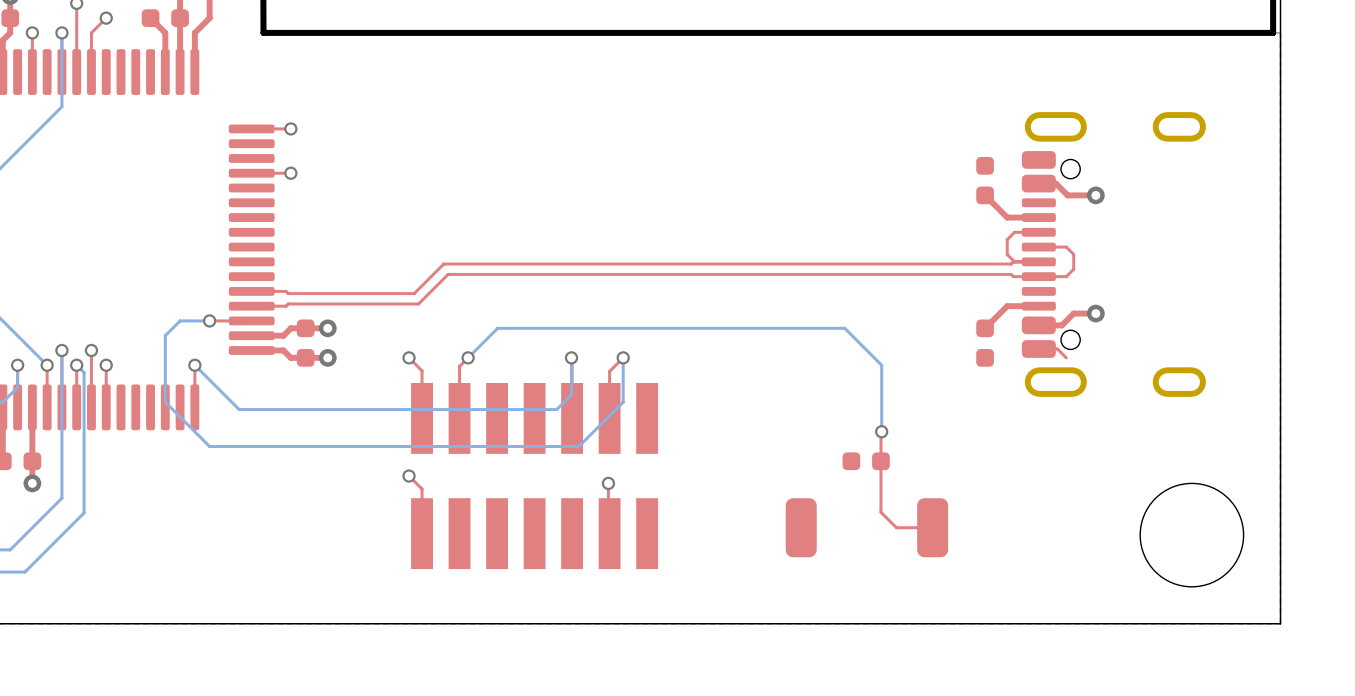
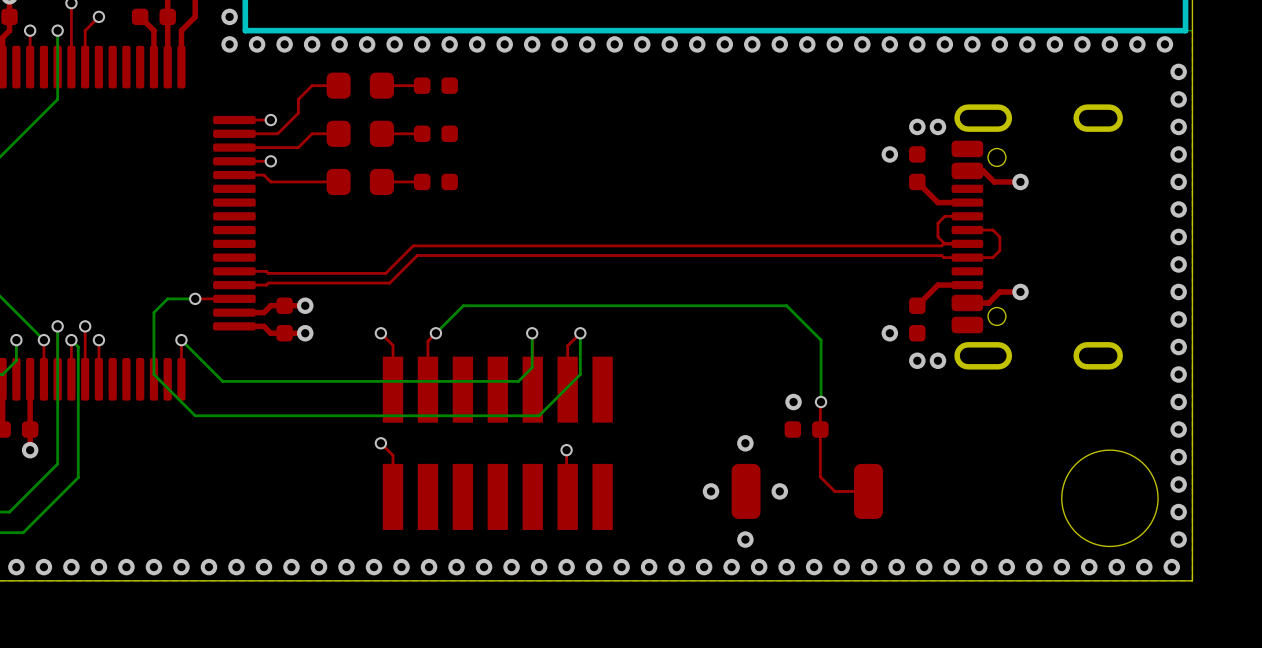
via: none -> (229, 16)
via: none -> (229, 44)
via: none -> (257, 44)
via: none -> (284, 44)
via: none -> (312, 44)
via: none -> (339, 44)
via: none -> (367, 44)
via: none -> (394, 44)
via: none -> (422, 44)
via: none -> (449, 44)
via: none -> (477, 44)
via: none -> (504, 44)
via: none -> (532, 44)
via: none -> (559, 44)
via: none -> (587, 44)
via: none -> (614, 44)
via: none -> (642, 44)
via: none -> (669, 44)
via: none -> (697, 44)
via: none -> (724, 44)
via: none -> (752, 44)
via: none -> (779, 44)
via: none -> (807, 44)
via: none -> (834, 44)
via: none -> (862, 44)
via: none -> (889, 44)
via: none -> (917, 44)
via: none -> (944, 44)
via: none -> (972, 44)
via: none -> (999, 44)
via: none -> (1027, 44)
via: none -> (1054, 44)
via: none -> (1082, 44)
via: none -> (1109, 44)
via: none -> (1137, 44)
via: none -> (1164, 44)
via: none -> (1178, 71)
top track: none -> (338, 85) (312, 85) (298, 99) (298, 113) (277, 133) (234, 133)
part: none -> (360, 85)
top track: none -> (422, 85) (381, 85)
part: none -> (435, 85)
via: none -> (1178, 99)
via: none -> (917, 126)
via: none -> (937, 126)
via: none -> (1178, 126)
top track: none -> (338, 133) (312, 133) (298, 147) (234, 147)
part: none -> (360, 133)
top track: none -> (422, 133) (381, 133)
part: none -> (435, 133)
via: none -> (889, 154)
via: none -> (1178, 154)
top track: none -> (234, 175) (263, 175) (270, 181) (338, 181)
part: none -> (360, 181)
top track: none -> (422, 181) (381, 181)
part: none -> (435, 181)
via: none -> (1178, 181)
via: none -> (1178, 209)
via: none -> (1178, 236)
via: none -> (1178, 264)
via: none -> (1178, 291)
via: none -> (1178, 319)
top track: (1038, 349) (1057, 349) (1066, 357) -> none
via: none -> (889, 333)
via: none -> (1178, 347)
via: none -> (917, 360)
via: none -> (937, 360)
via: none -> (1178, 374)
via: none -> (793, 402)
via: none -> (1178, 402)
via: none -> (1178, 429)
via: none -> (745, 443)
via: none -> (1178, 457)
via: none -> (1178, 484)
via: none -> (711, 491)
via: none -> (779, 491)
via: none -> (1178, 512)
via: none -> (745, 539)
via: none -> (1178, 539)
via: none -> (16, 567)
via: none -> (43, 567)
via: none -> (71, 567)
via: none -> (98, 567)
via: none -> (126, 567)
via: none -> (153, 567)
via: none -> (181, 567)
via: none -> (208, 567)
via: none -> (236, 567)
via: none -> (263, 567)
via: none -> (291, 567)
via: none -> (319, 567)
via: none -> (346, 567)
via: none -> (374, 567)
via: none -> (401, 567)
via: none -> (429, 567)
via: none -> (456, 567)
via: none -> (484, 567)
via: none -> (511, 567)
via: none -> (539, 567)
via: none -> (566, 567)
via: none -> (594, 567)
via: none -> (621, 567)
via: none -> (649, 567)
via: none -> (676, 567)
via: none -> (704, 567)
via: none -> (731, 567)
via: none -> (759, 567)
via: none -> (786, 567)
via: none -> (814, 567)
via: none -> (841, 567)
via: none -> (869, 567)
via: none -> (896, 567)
via: none -> (924, 567)
via: none -> (951, 567)
via: none -> (979, 567)
via: none -> (1006, 567)
via: none -> (1034, 567)
via: none -> (1061, 567)
via: none -> (1089, 567)
via: none -> (1116, 567)
via: none -> (1144, 567)
via: none -> (1171, 567)

